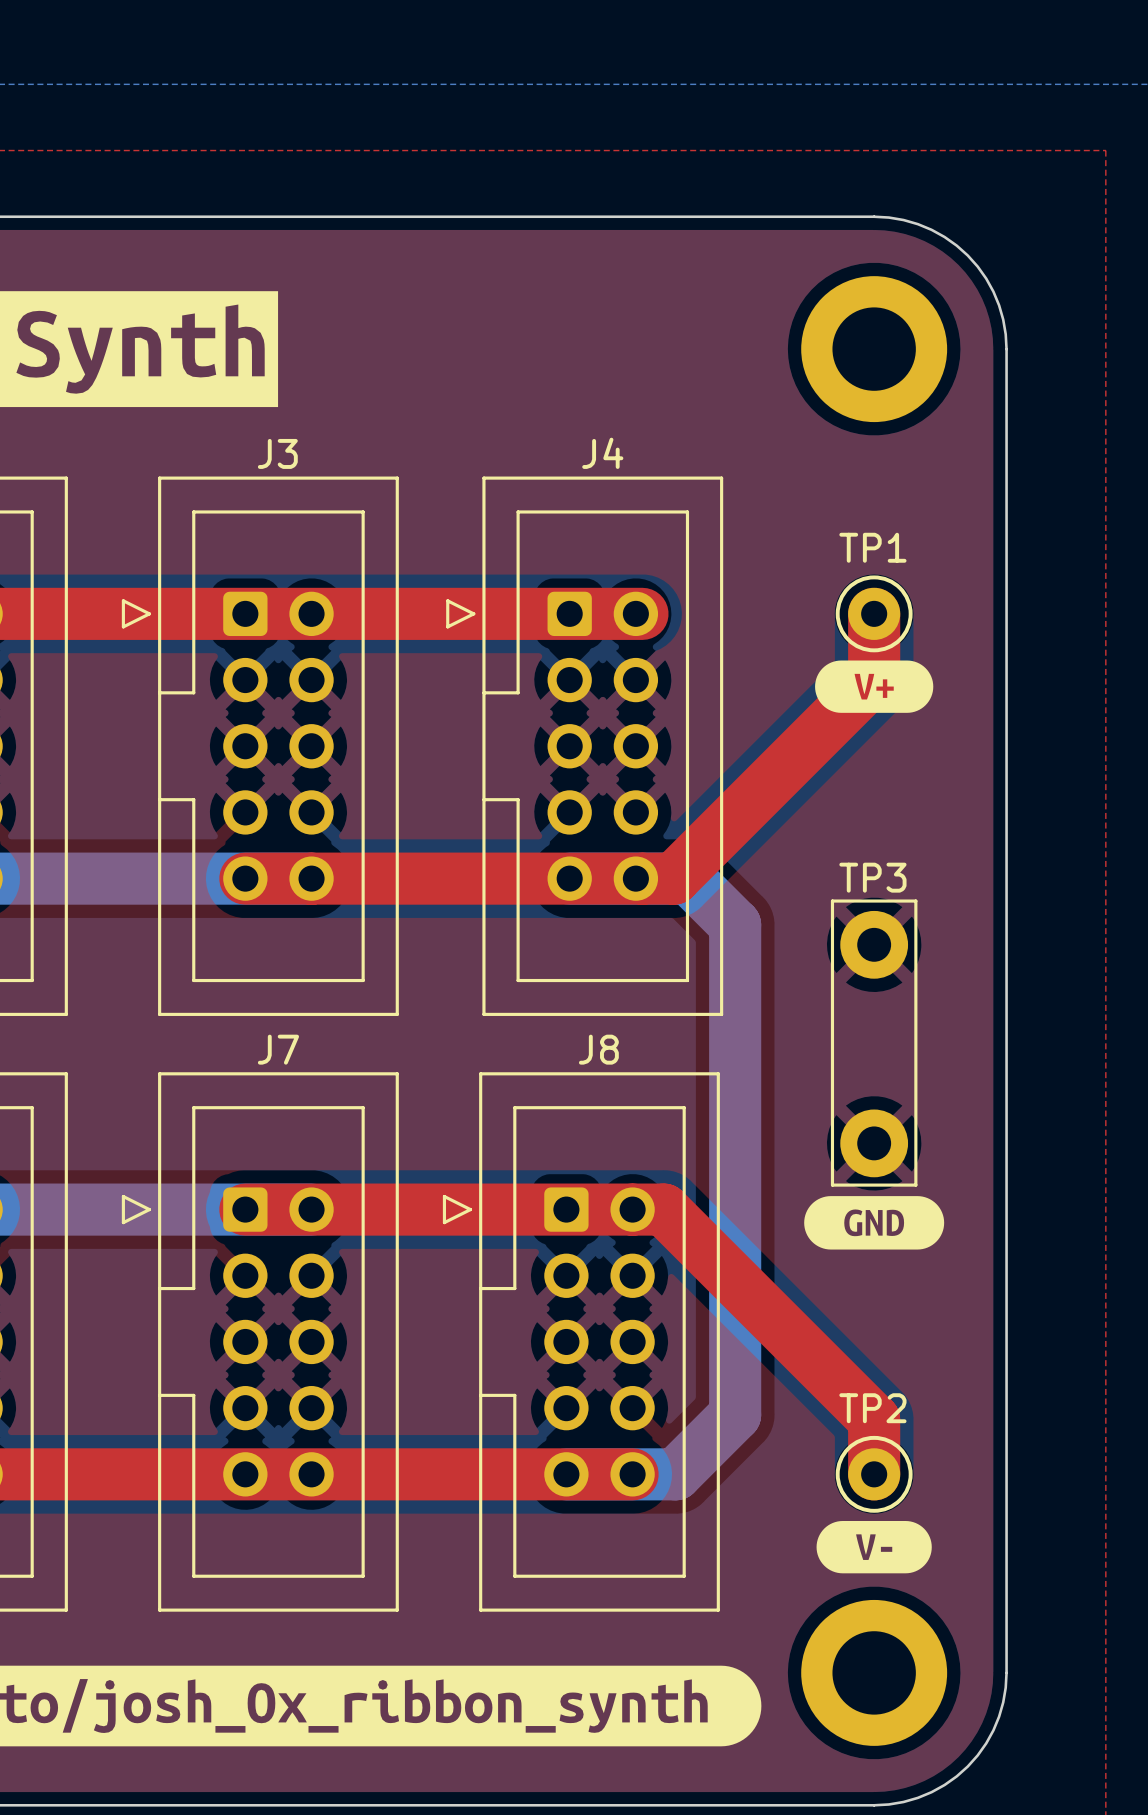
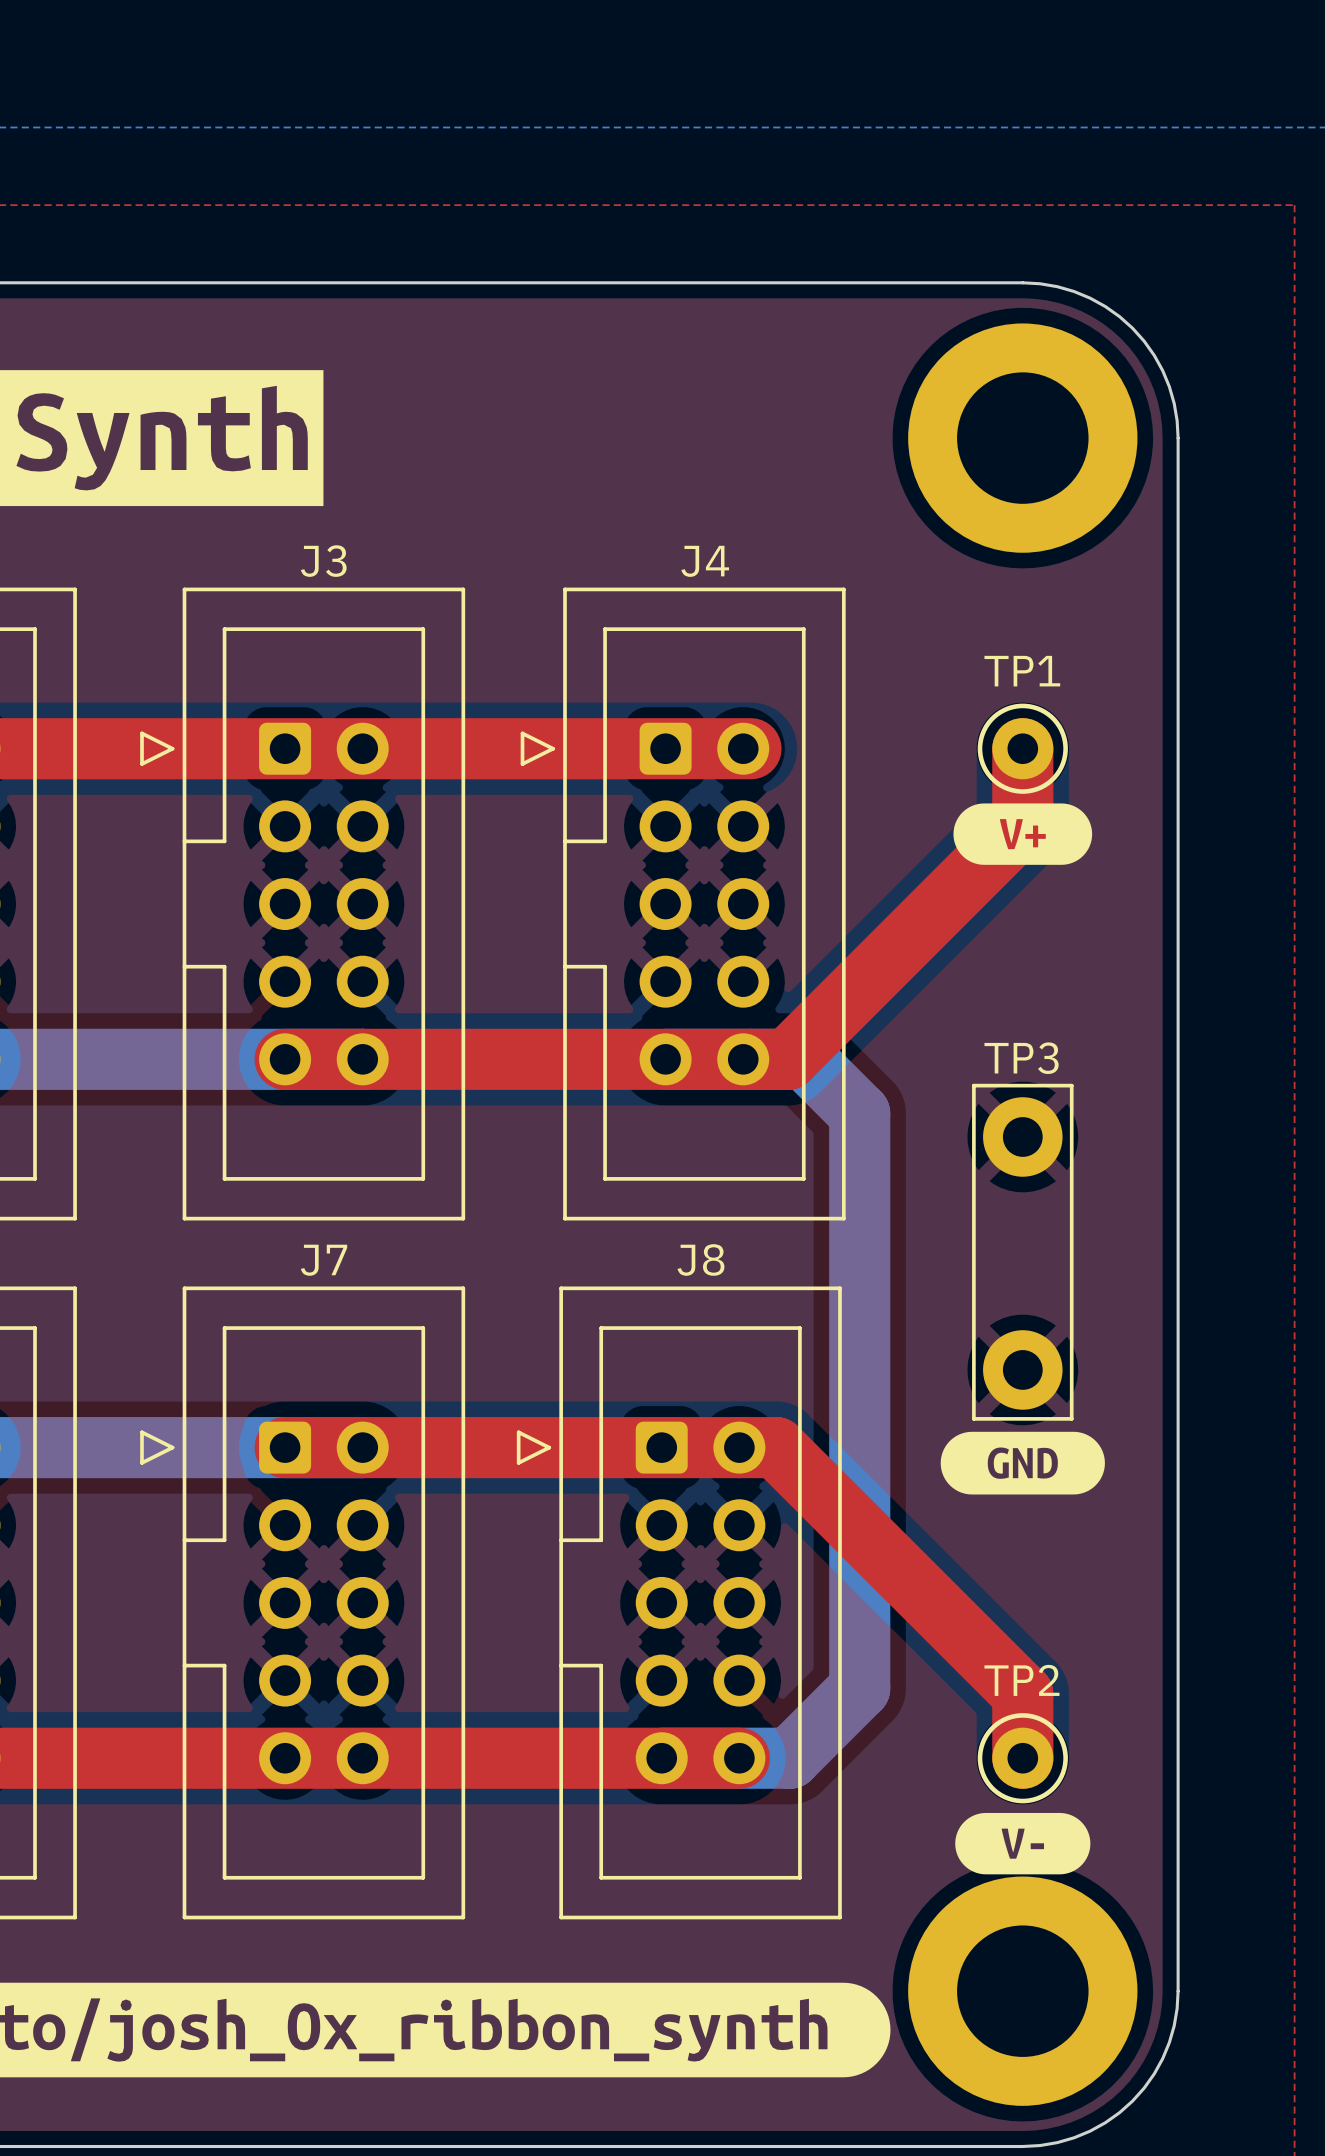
part footprint: [801, 276, 948, 423] -> [908, 323, 1138, 553]
part footprint: [801, 1599, 948, 1746] -> [908, 1876, 1138, 2106]

